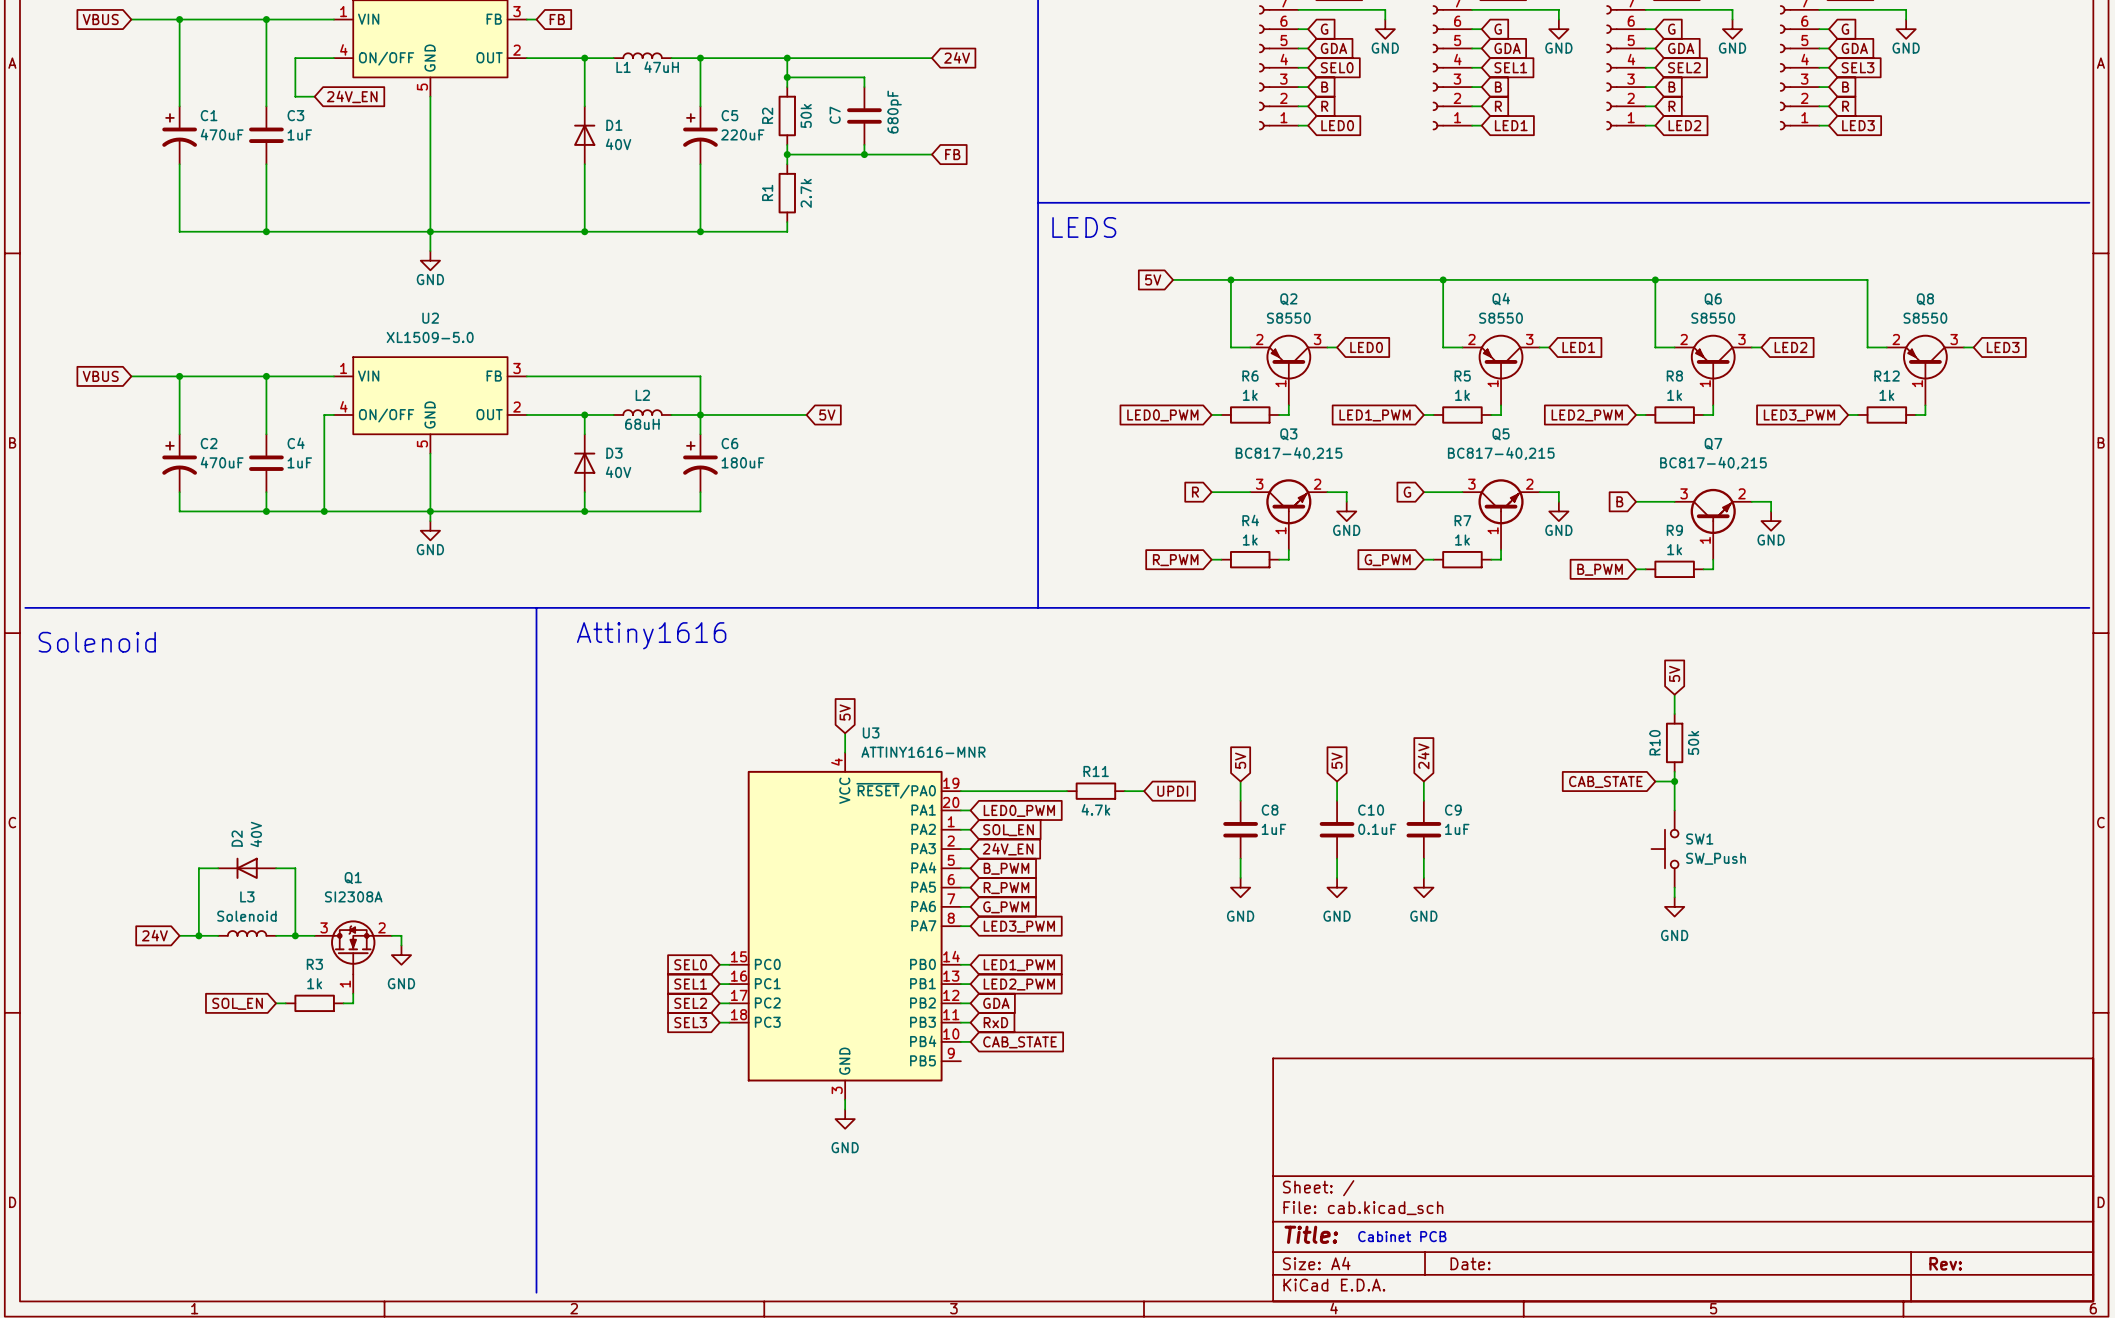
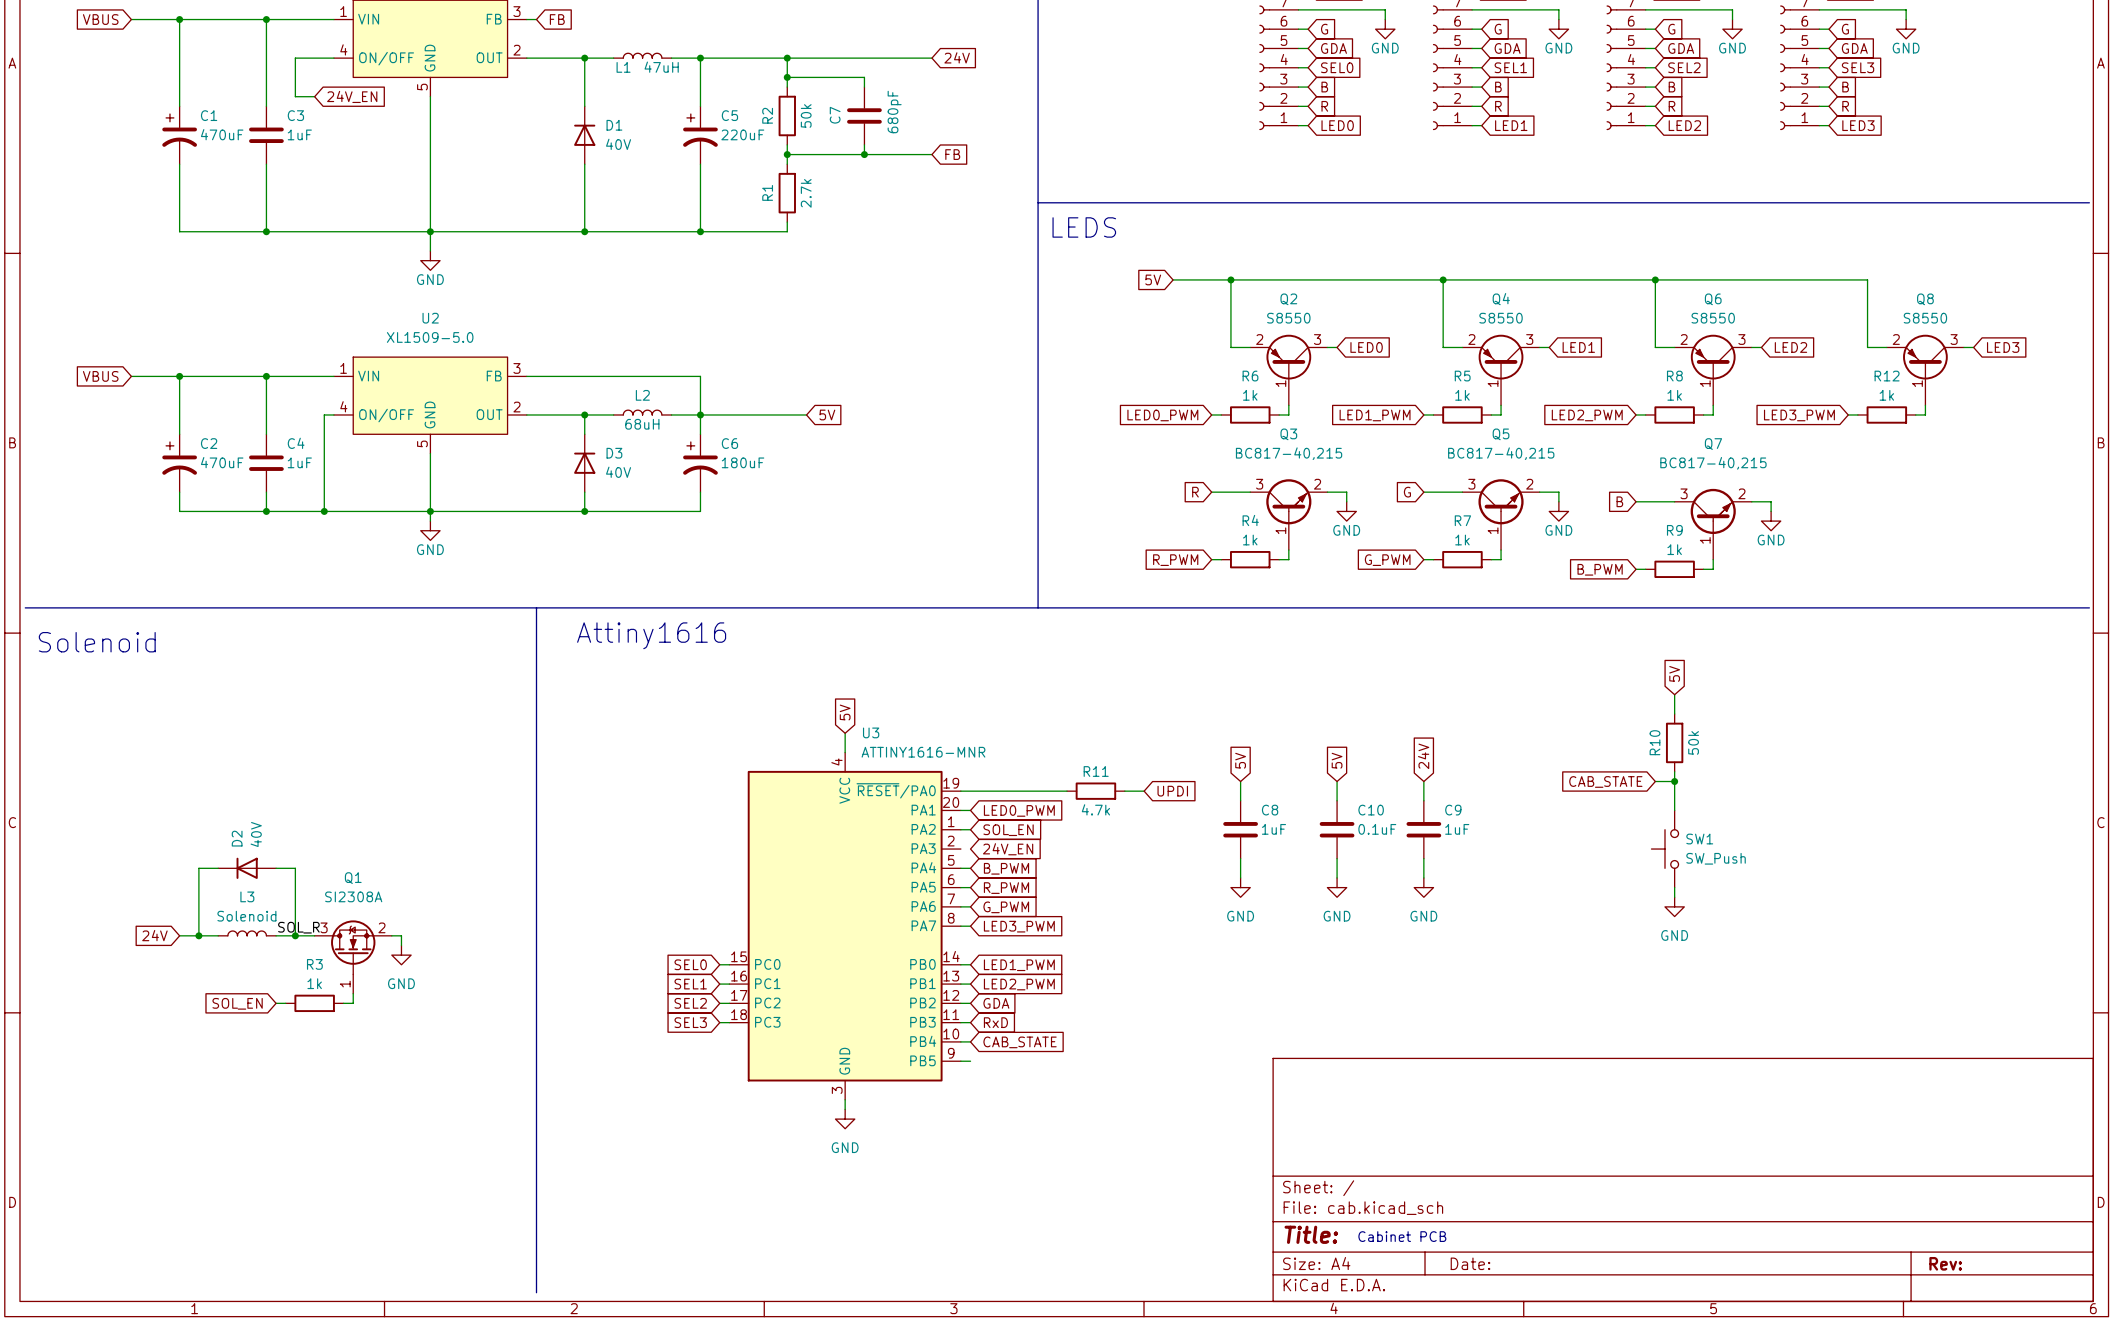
wire: (960, 849) (970, 849) -> none
label: none -> SOL_R (298, 927)
wire: none -> (960, 1061) (970, 1061)

